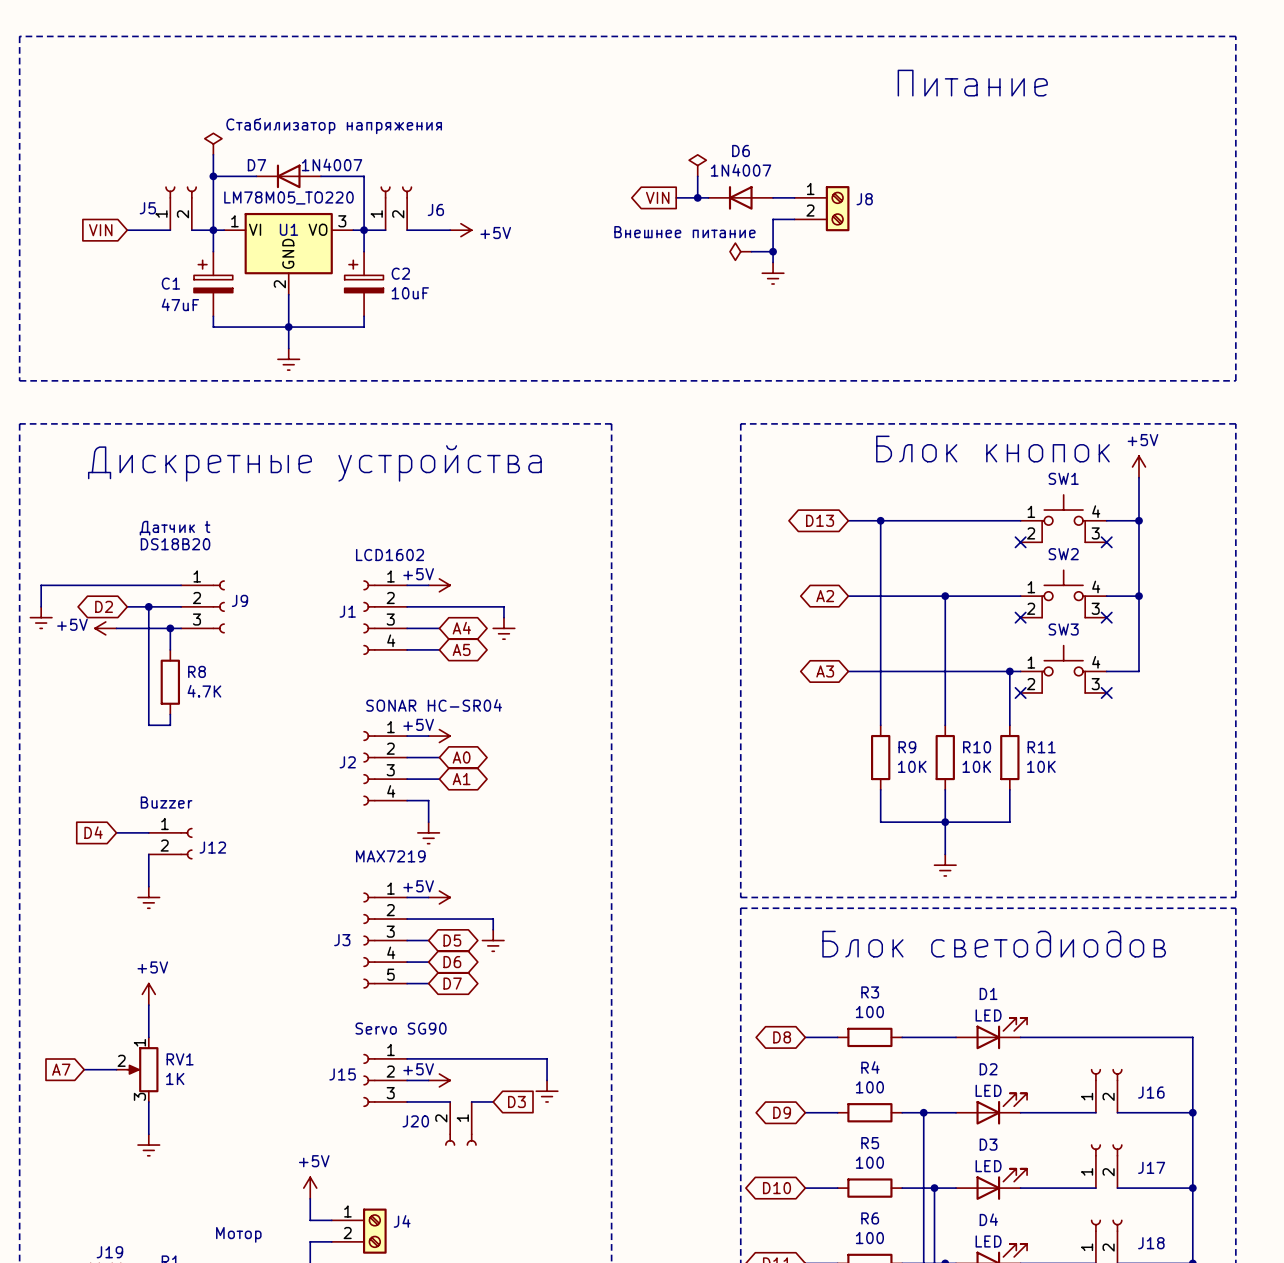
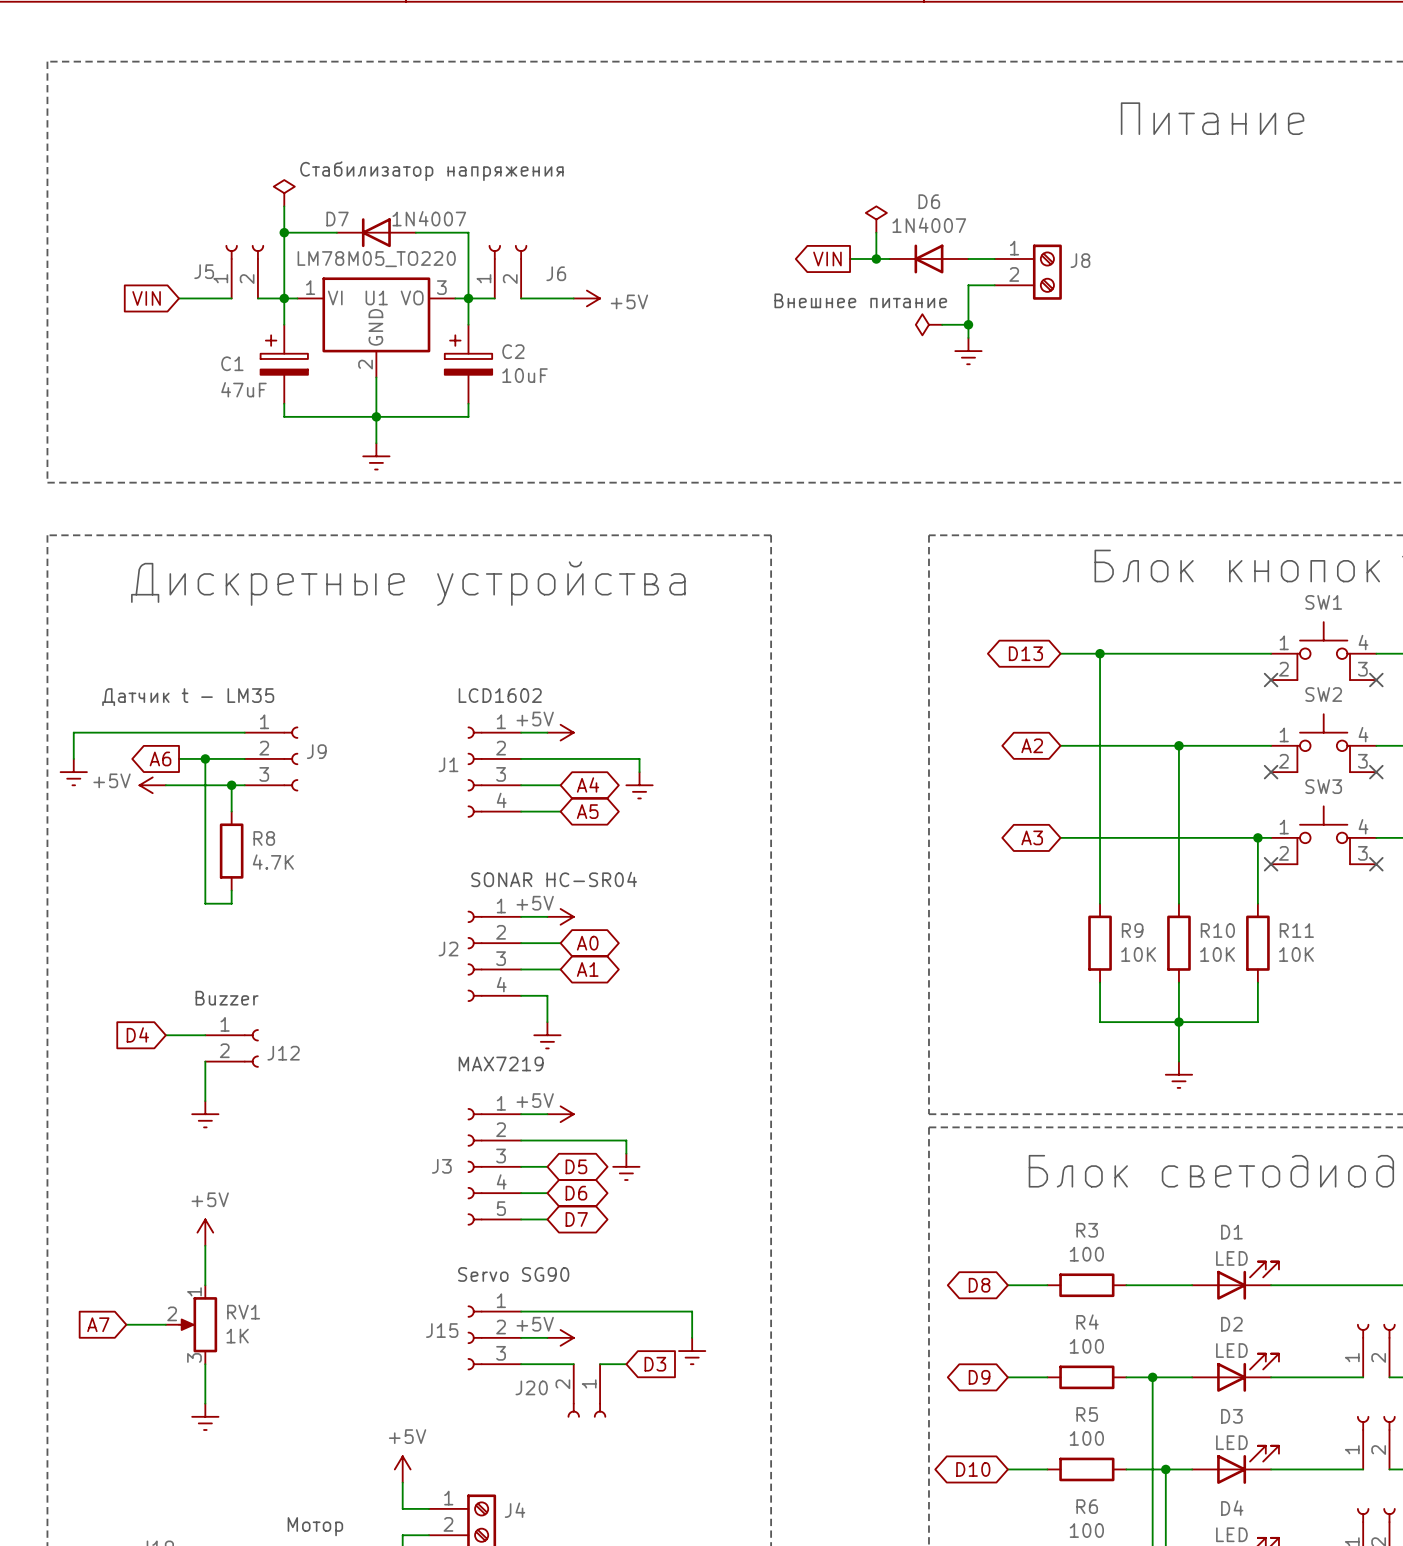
text: Датчик t (175, 528) -> none
text: DS18B20 (175, 544) -> none
text: none -> Датчик t - LM35 (188, 697)
global label shape: bidirectional (104, 606) -> output (160, 758)
global label: D2 (104, 606) -> A6 (160, 758)

